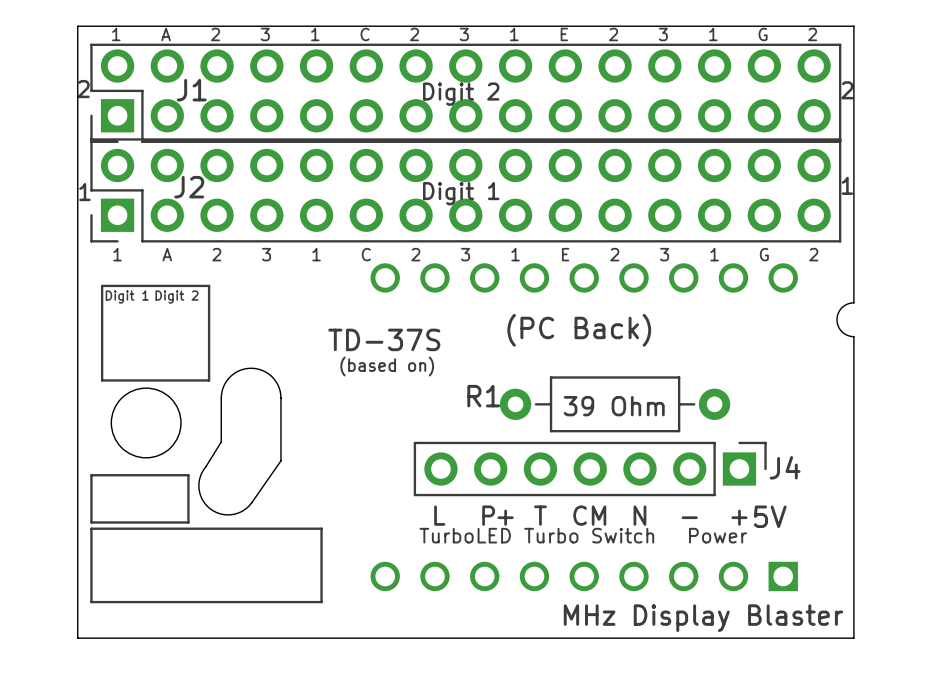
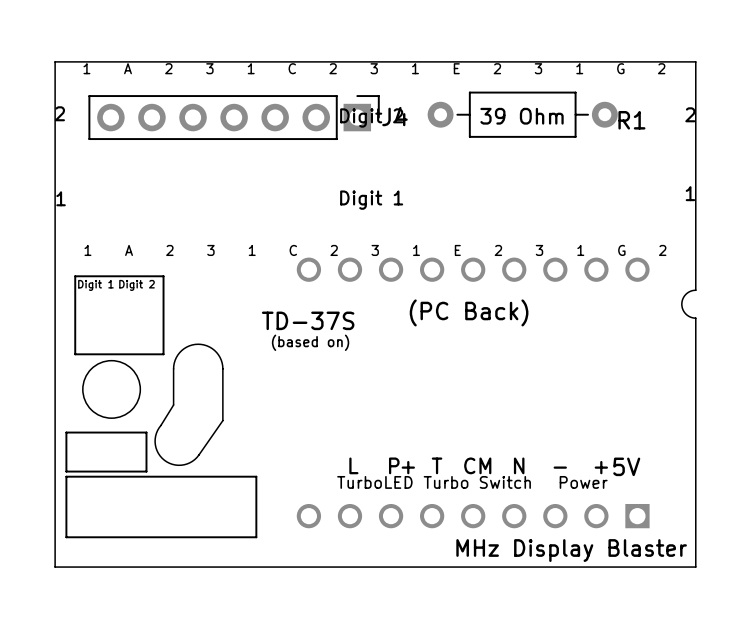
J1: (465, 93) -> none
J2: (465, 190) -> none
R1 name position: R1 (483, 396) -> R1 (631, 120)
R1 position: (615, 404) -> (522, 114)
J4 position: (590, 469) -> (234, 117)

